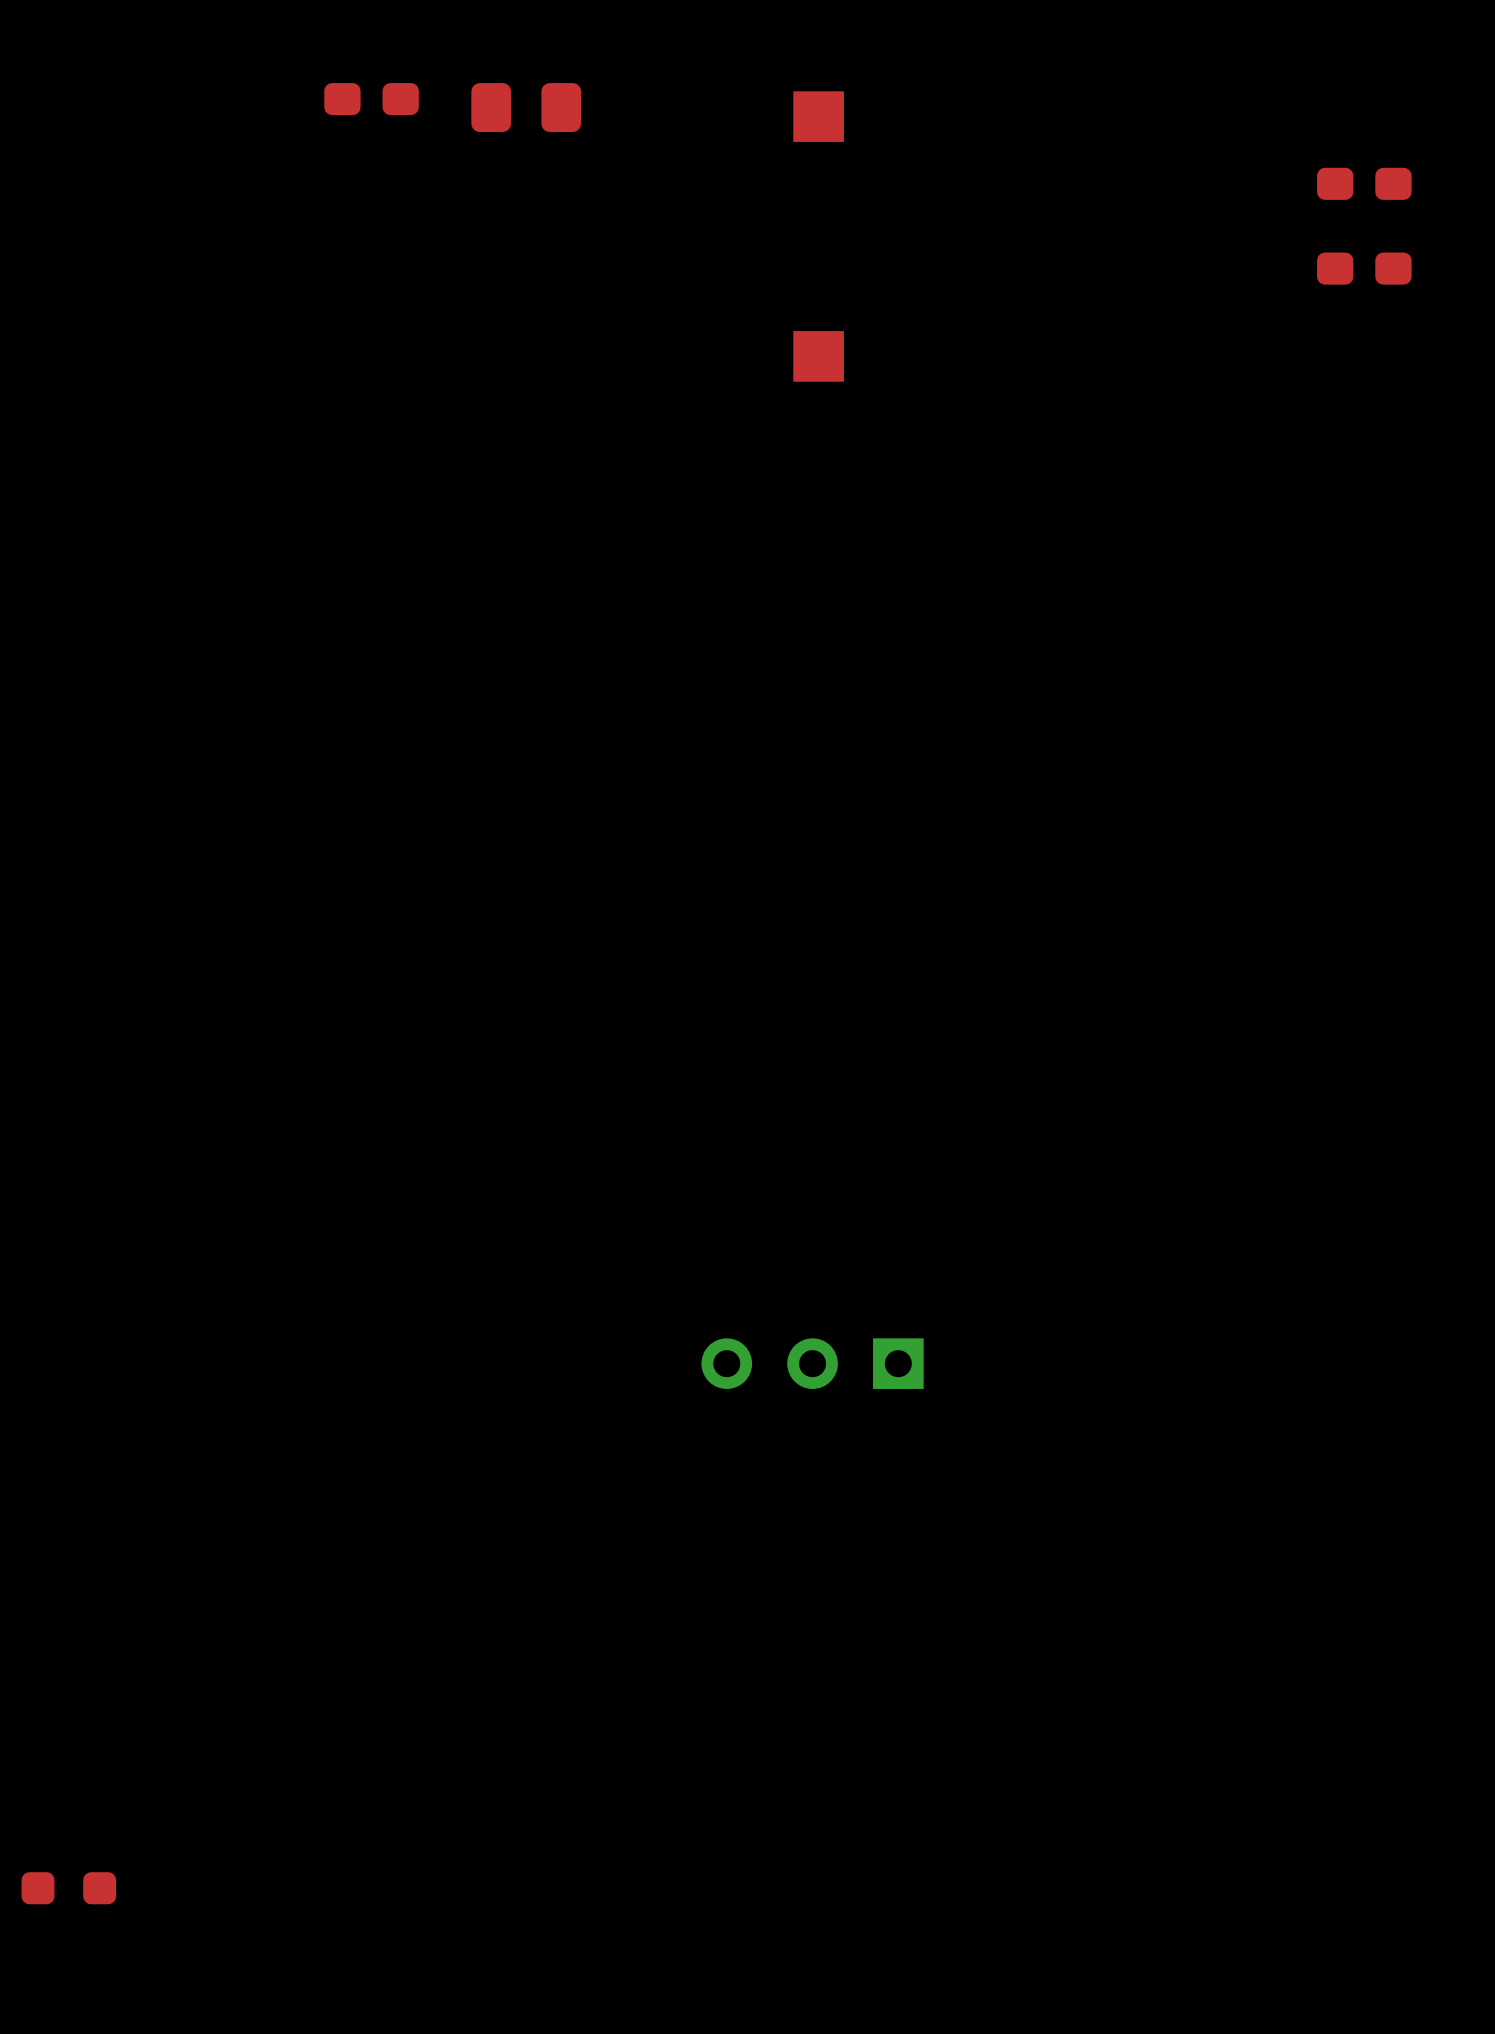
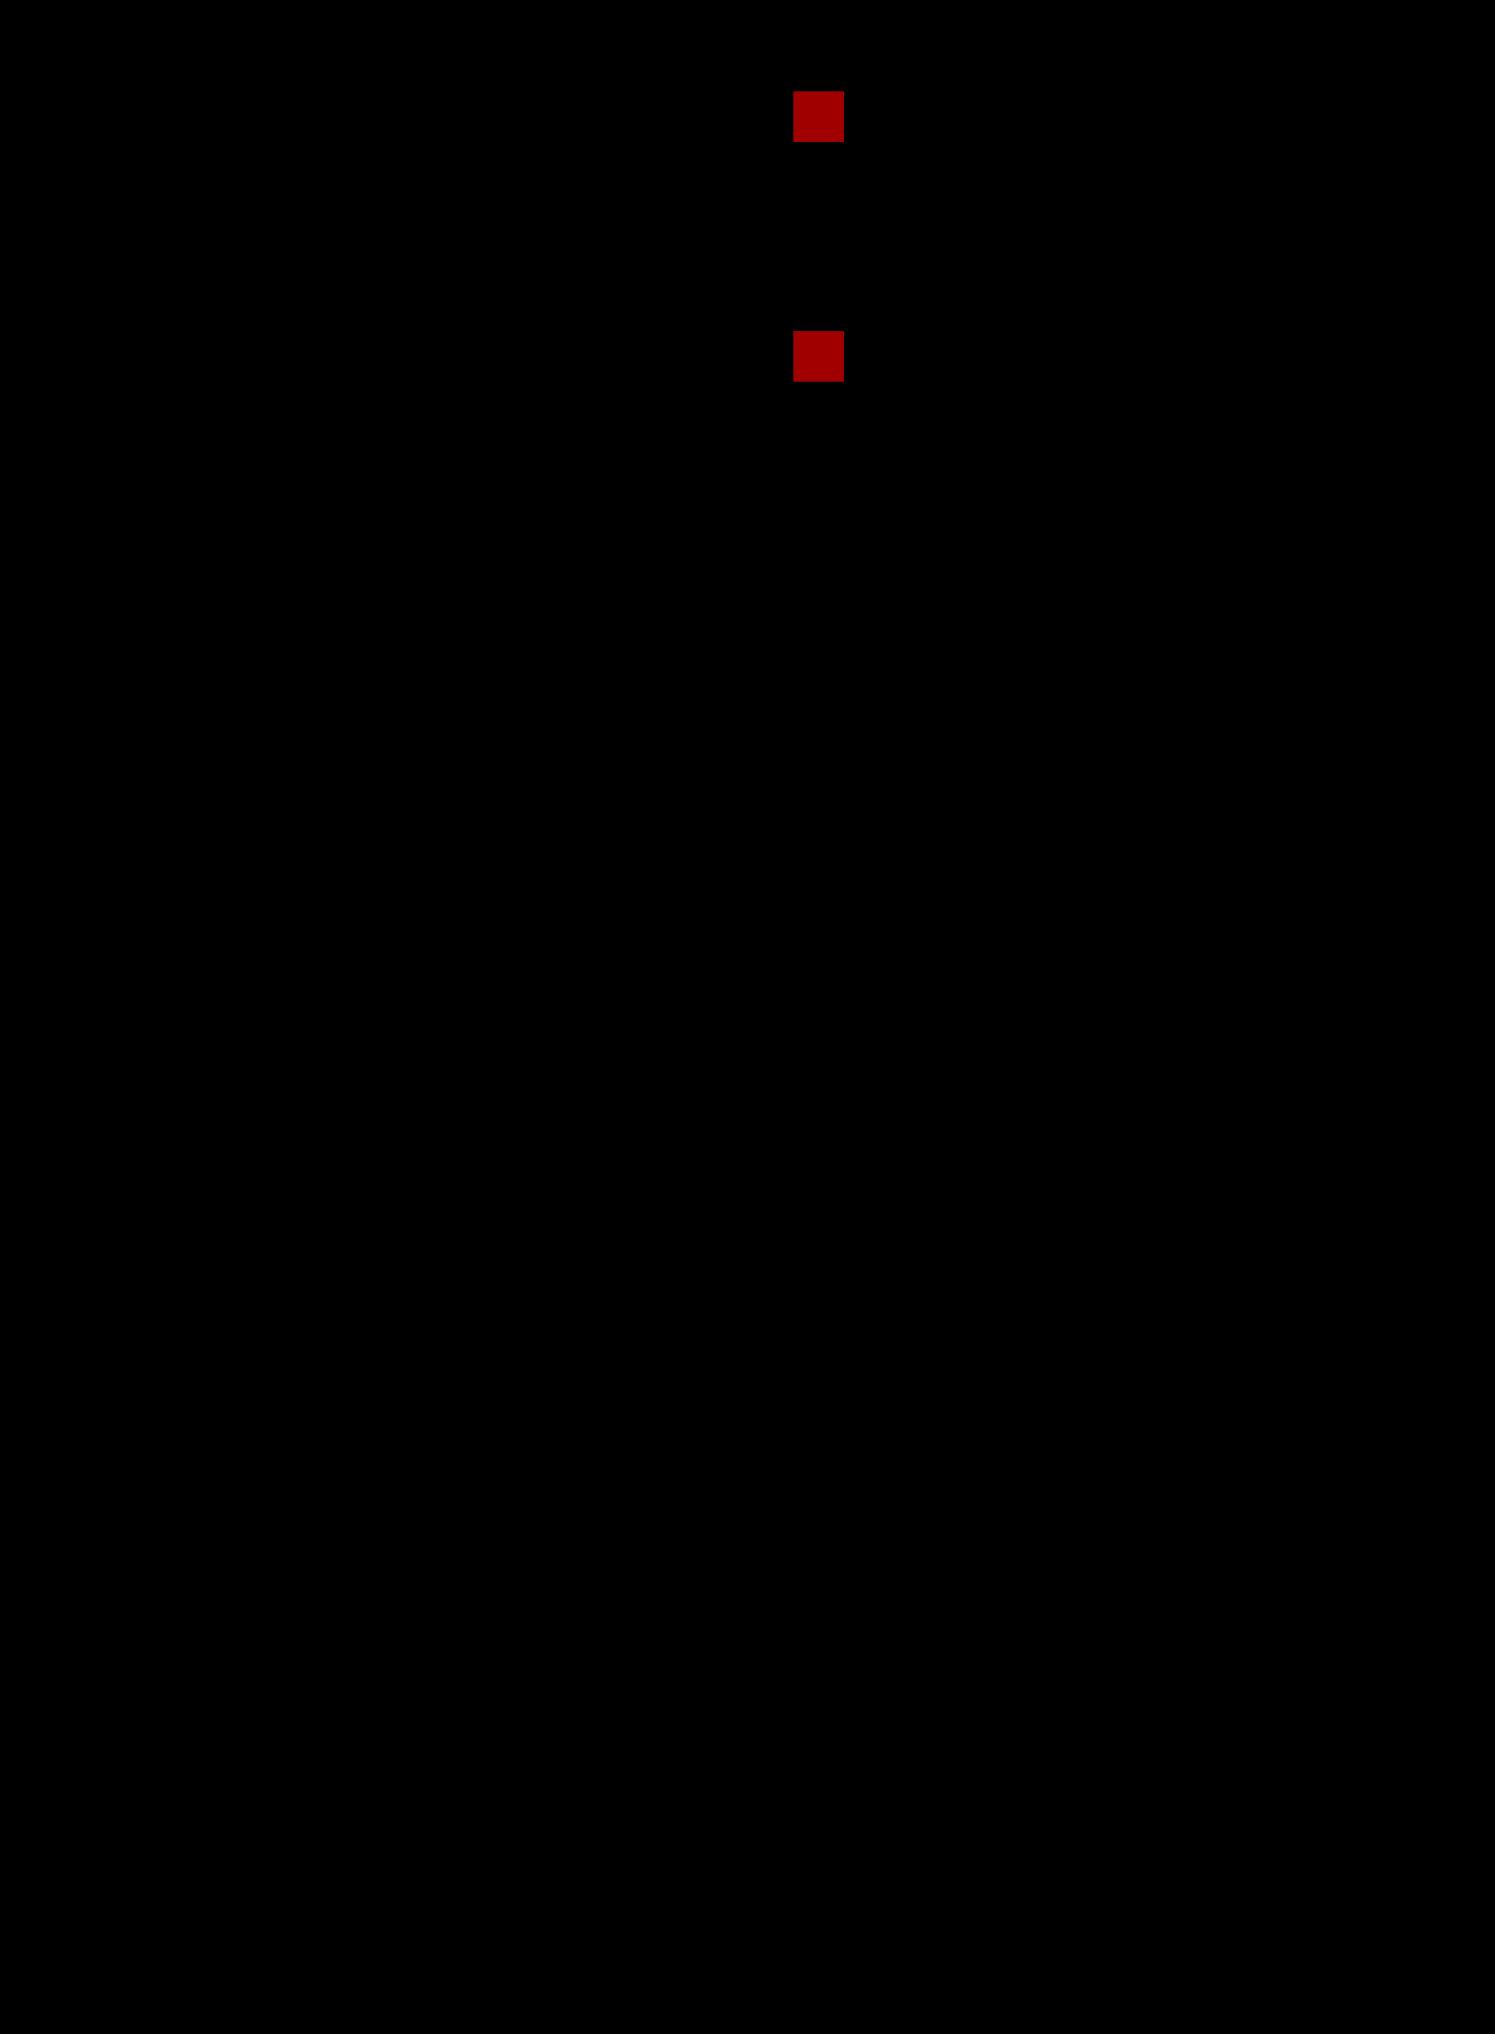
part: (371, 99) -> none
part: (526, 107) -> none
part: (1364, 183) -> none
part: (1364, 268) -> none
part: (812, 1363) -> none
part: (68, 1888) -> none

